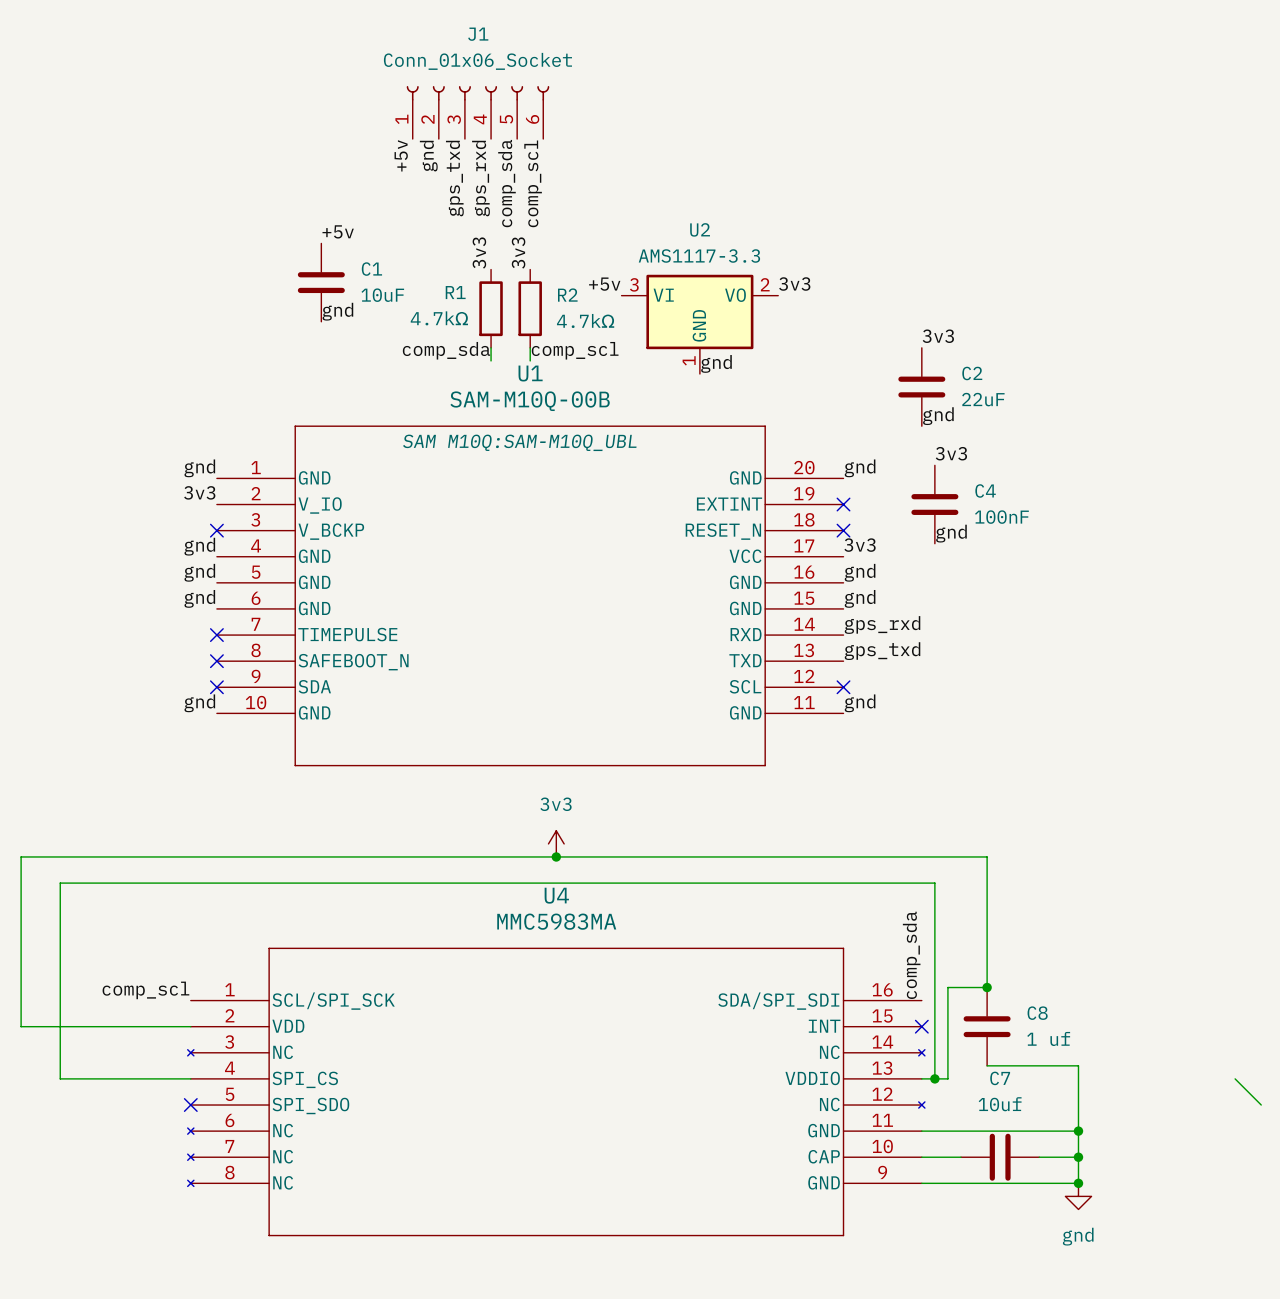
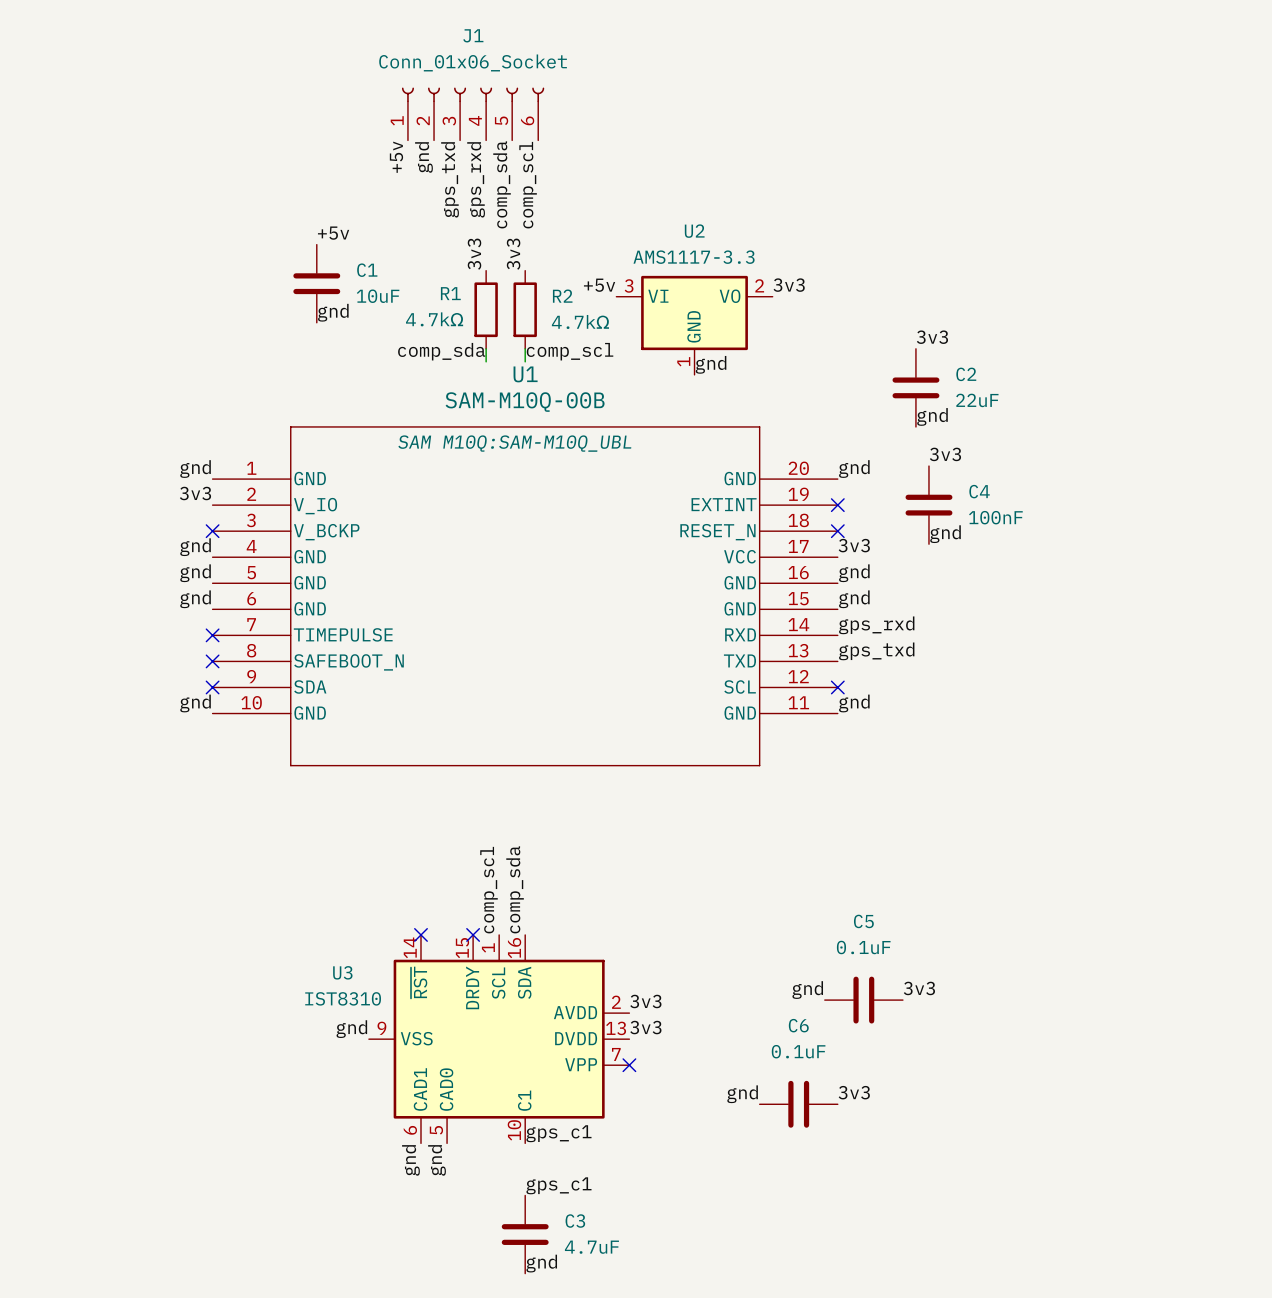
power symbol: 3v3 (556, 843) -> none
junction: (556, 856) -> none
label: none -> comp_scl (489, 890)
label: none -> comp_sda (515, 889)
no-connect mark: none -> (420, 934)
no-connect mark: none -> (473, 934)
label: comp_sda (911, 955) -> 3v3 (919, 988)
junction: (987, 987) -> none
label: comp_scl (145, 990) -> none
label: none -> gnd (807, 990)
C5: none -> 0.1uF (863, 1000)
label: none -> 3v3 (645, 1001)
wire: (190, 1026) (21, 1026) (21, 856) (987, 856) (987, 987) (947, 987) (947, 1078) (921, 1078) -> none
no-connect mark: (921, 1026) -> none
C8: 1 uf (987, 1026) -> none
label: none -> 3v3 (645, 1027)
label: none -> gnd (351, 1029)
U3: none -> IST8310 (499, 1039)
no-connect mark: none -> (629, 1065)
wire: (987, 1065) (1078, 1065) (1078, 1183) (921, 1183) -> none
wire: (190, 1078) (60, 1078) (60, 883) (934, 883) (934, 1078) -> none
junction: (934, 1078) -> none
wire: (1235, 1078) (1261, 1105) -> none
U4: MMC5983MA (556, 1091) -> none
label: none -> 3v3 (854, 1092)
label: none -> gnd (742, 1094)
no-connect mark: (190, 1105) -> none
C6: none -> 0.1uF (798, 1104)
wire: (921, 1131) (1078, 1131) -> none
junction: (1078, 1131) -> none
label: none -> gps_c1 (558, 1133)
wire: (921, 1157) (960, 1157) -> none
C7: 10uf (1000, 1157) -> none
wire: (1039, 1157) (1078, 1157) -> none
junction: (1078, 1157) -> none
label: none -> gnd (410, 1160)
label: none -> gnd (437, 1160)
junction: (1078, 1183) -> none
label: none -> gps_c1 (558, 1185)
power symbol: gnd (1078, 1196) -> none
C3: none -> 4.7uF (525, 1234)
label: none -> gnd (541, 1263)

